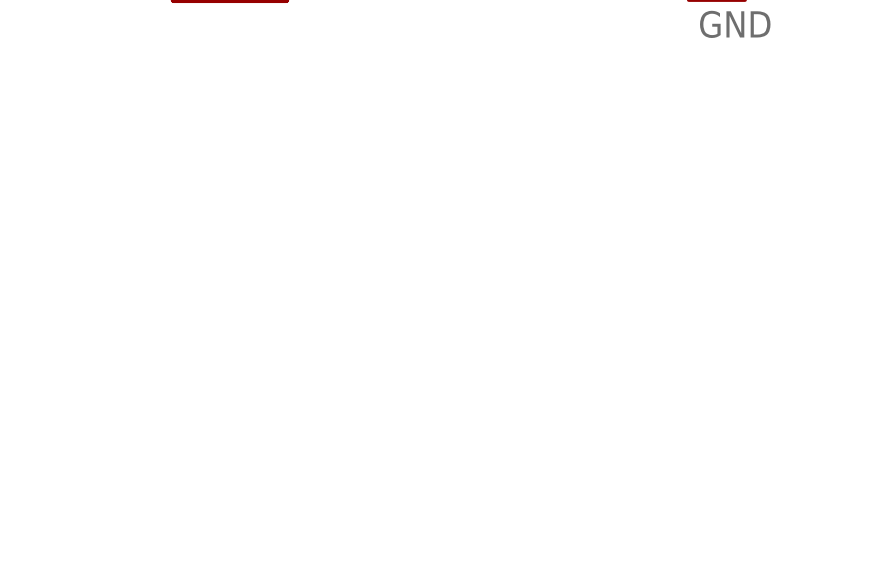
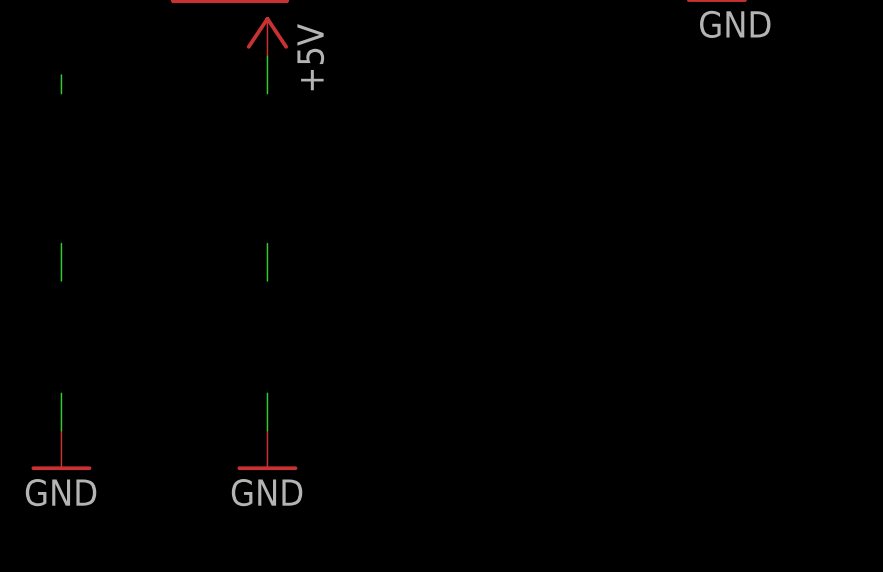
power symbol: none -> +5V (267, 36)
wire: none -> (267, 56) (267, 93)
wire: none -> (61, 74) (61, 93)
wire: none -> (61, 243) (61, 280)
wire: none -> (267, 243) (267, 280)
wire: none -> (61, 393) (61, 430)
wire: none -> (267, 393) (267, 430)
power symbol: none -> GND (61, 450)
power symbol: none -> GND (267, 450)

